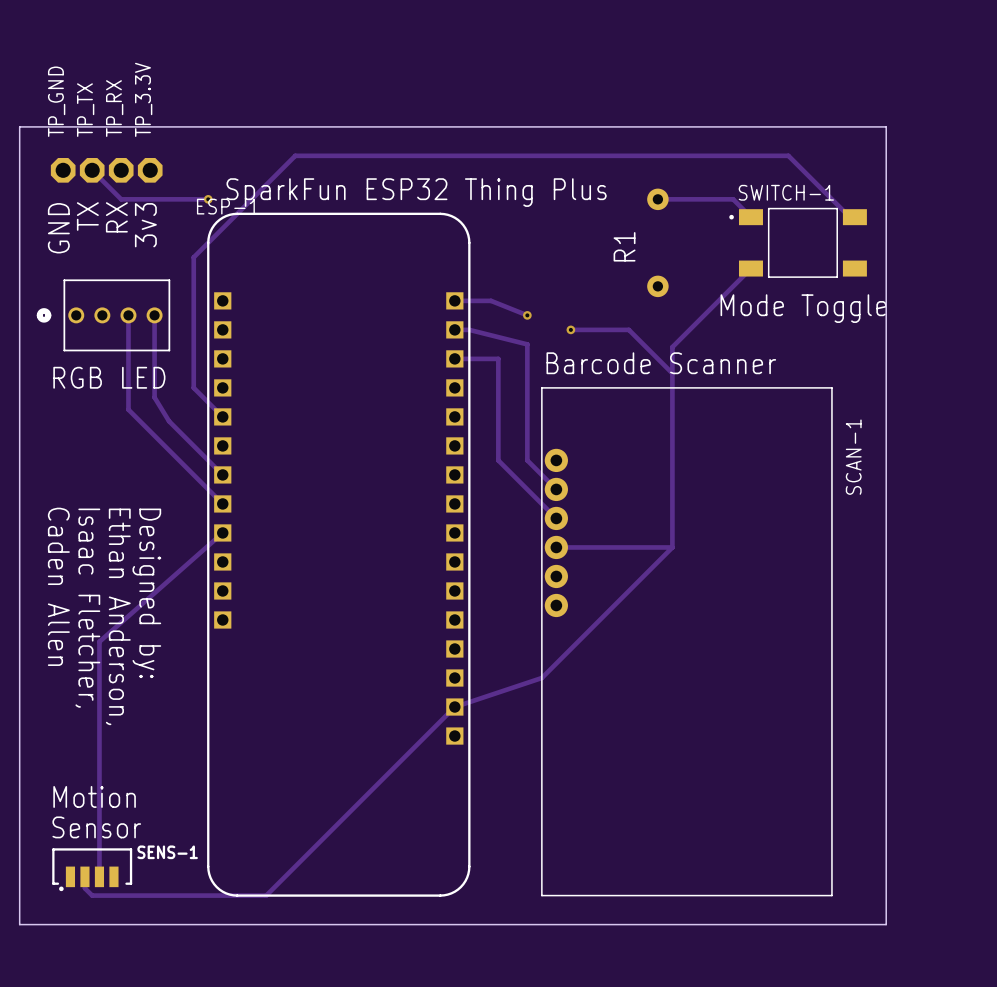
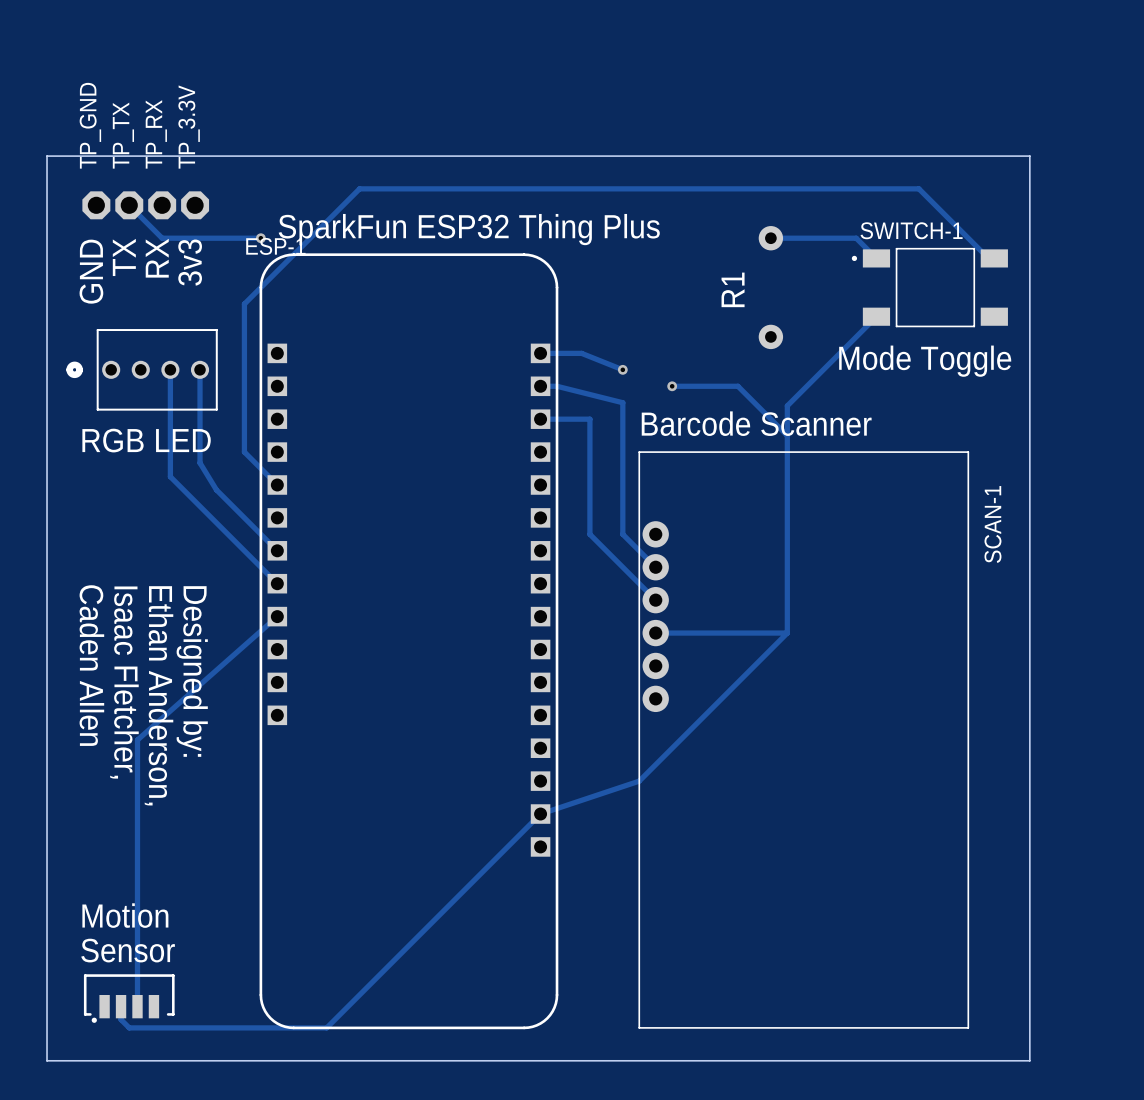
SENS-1 name: SENS-1 (167, 852) -> none

